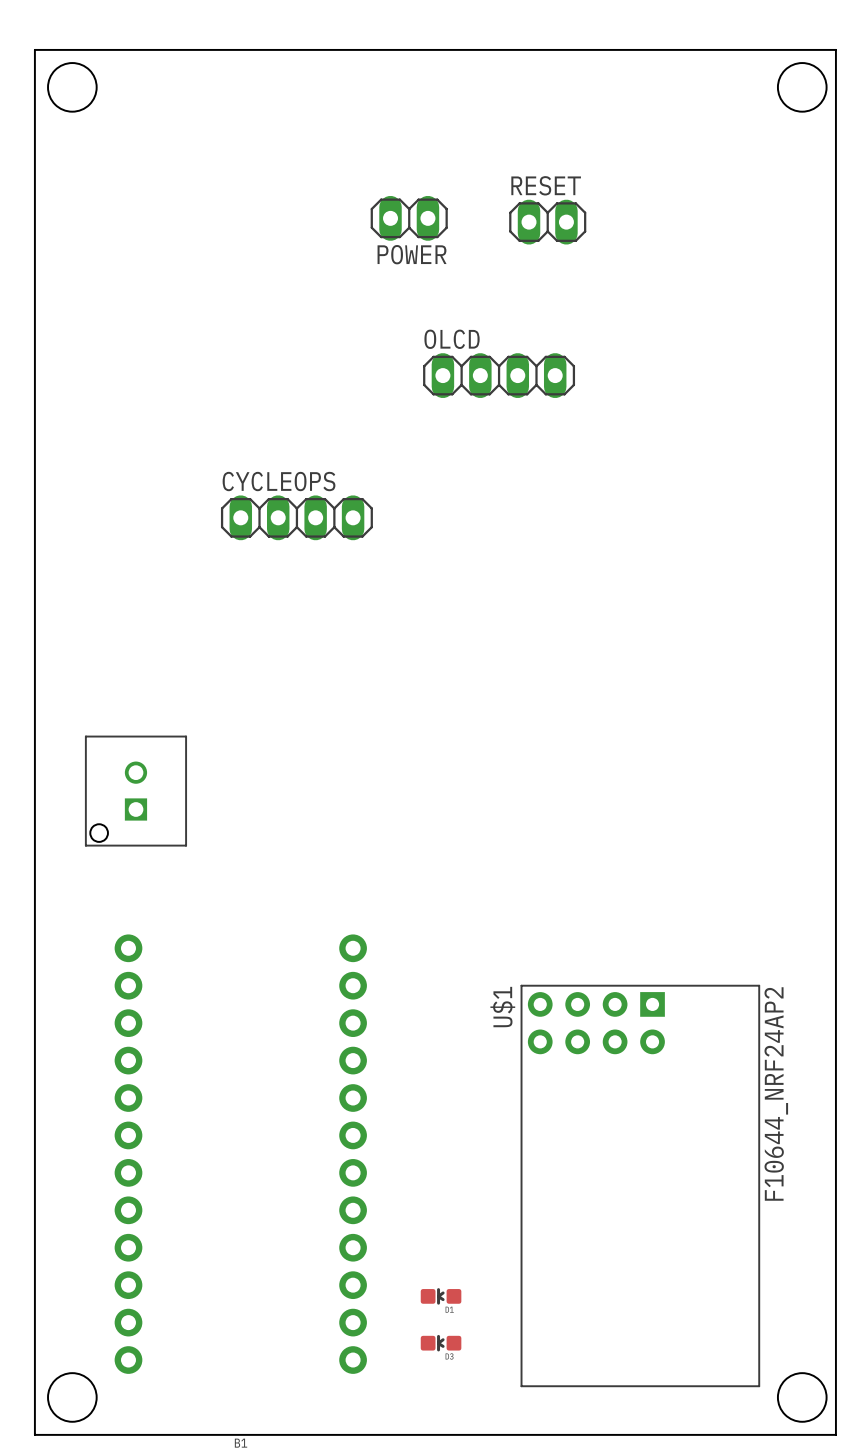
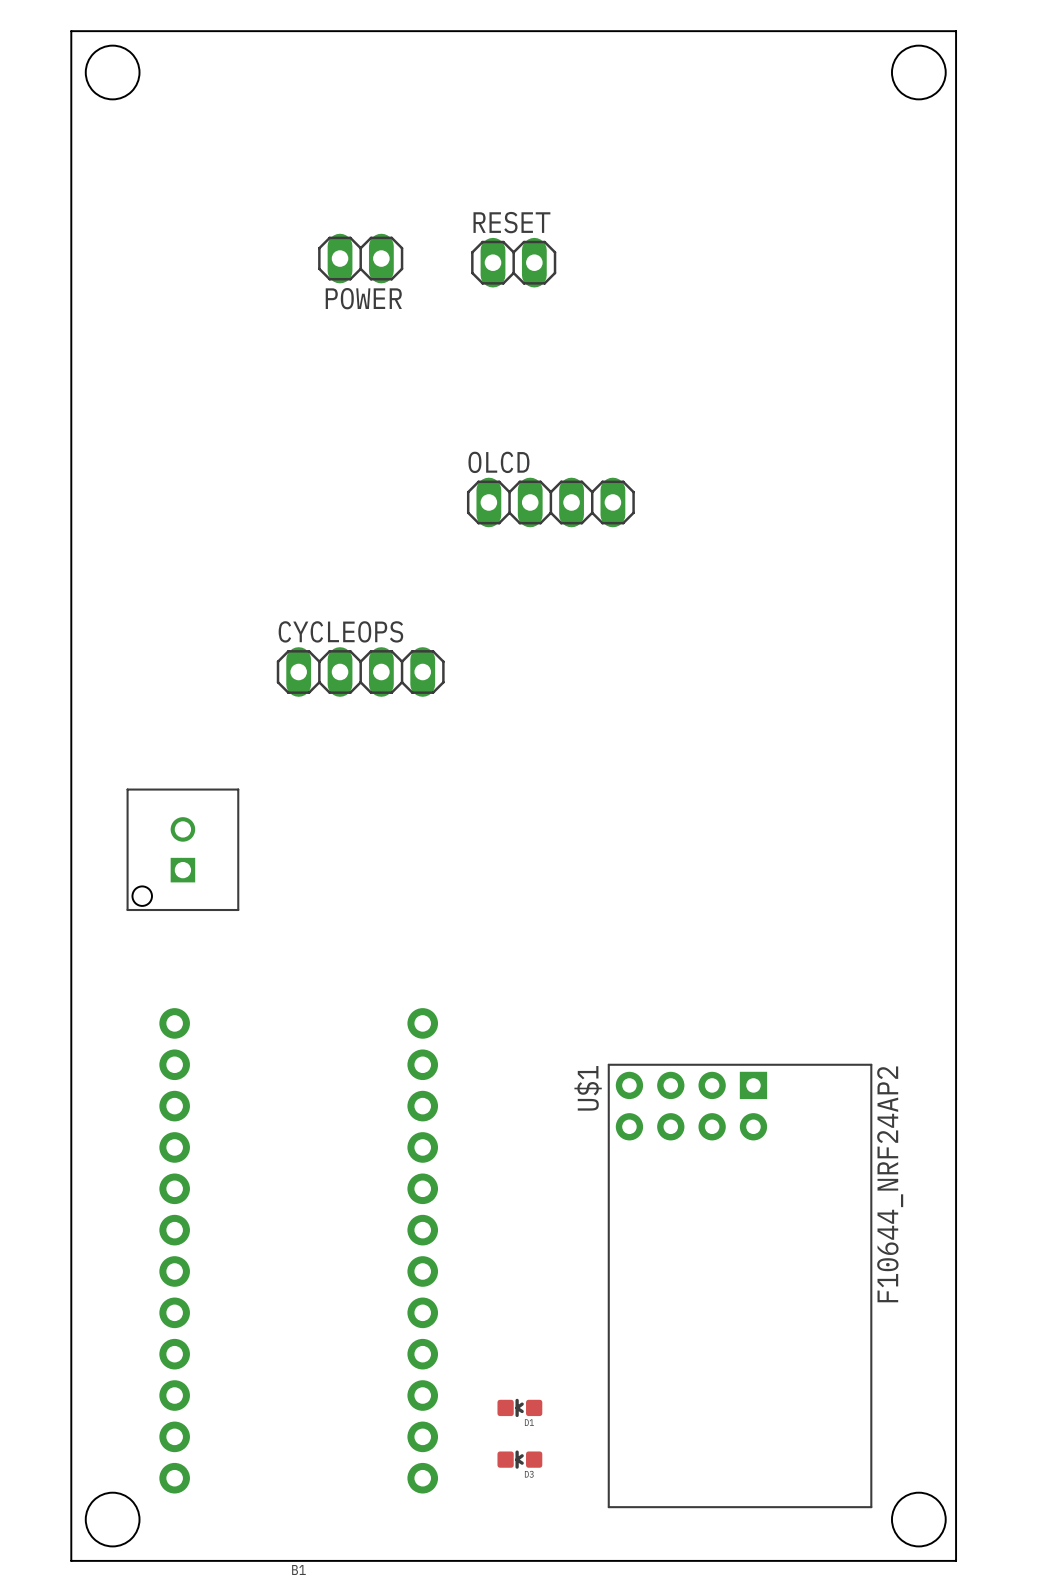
POWER position: (409, 218) -> (360, 258)
RESET position: (547, 222) -> (513, 262)
OLCD position: (499, 375) -> (550, 502)
CYCLEOPS position: (296, 517) -> (360, 672)

